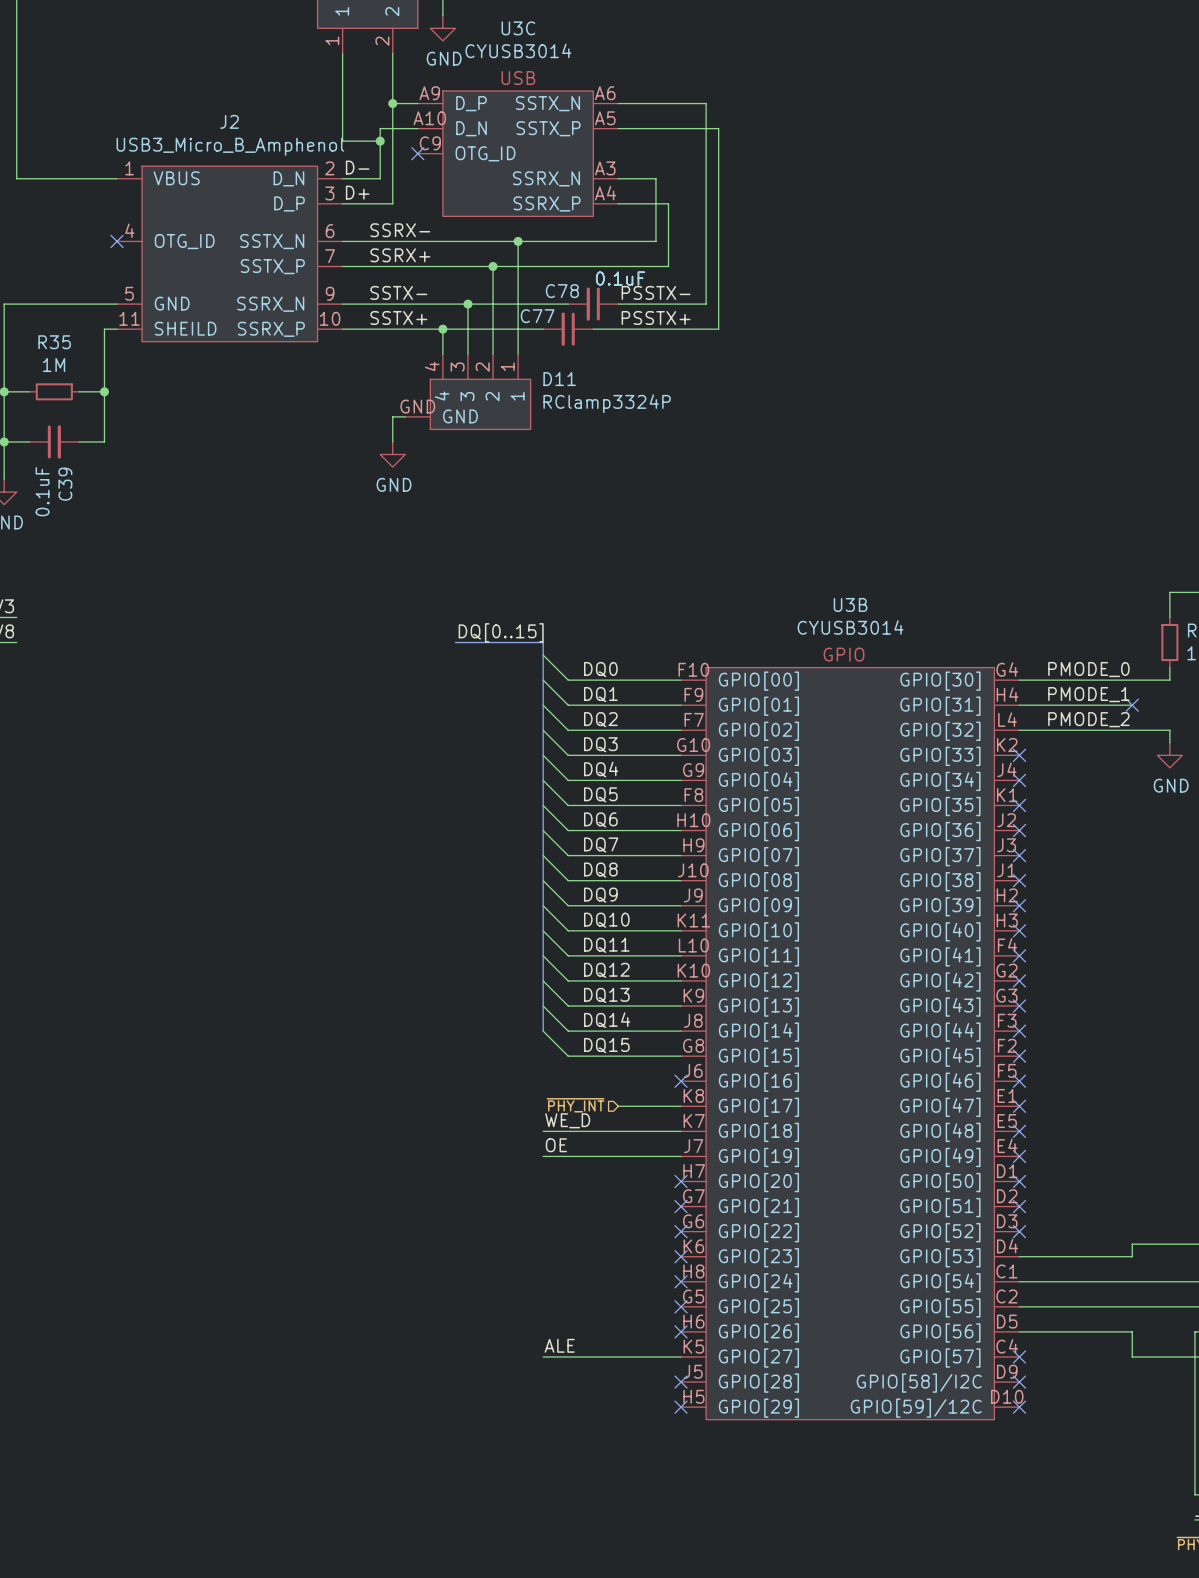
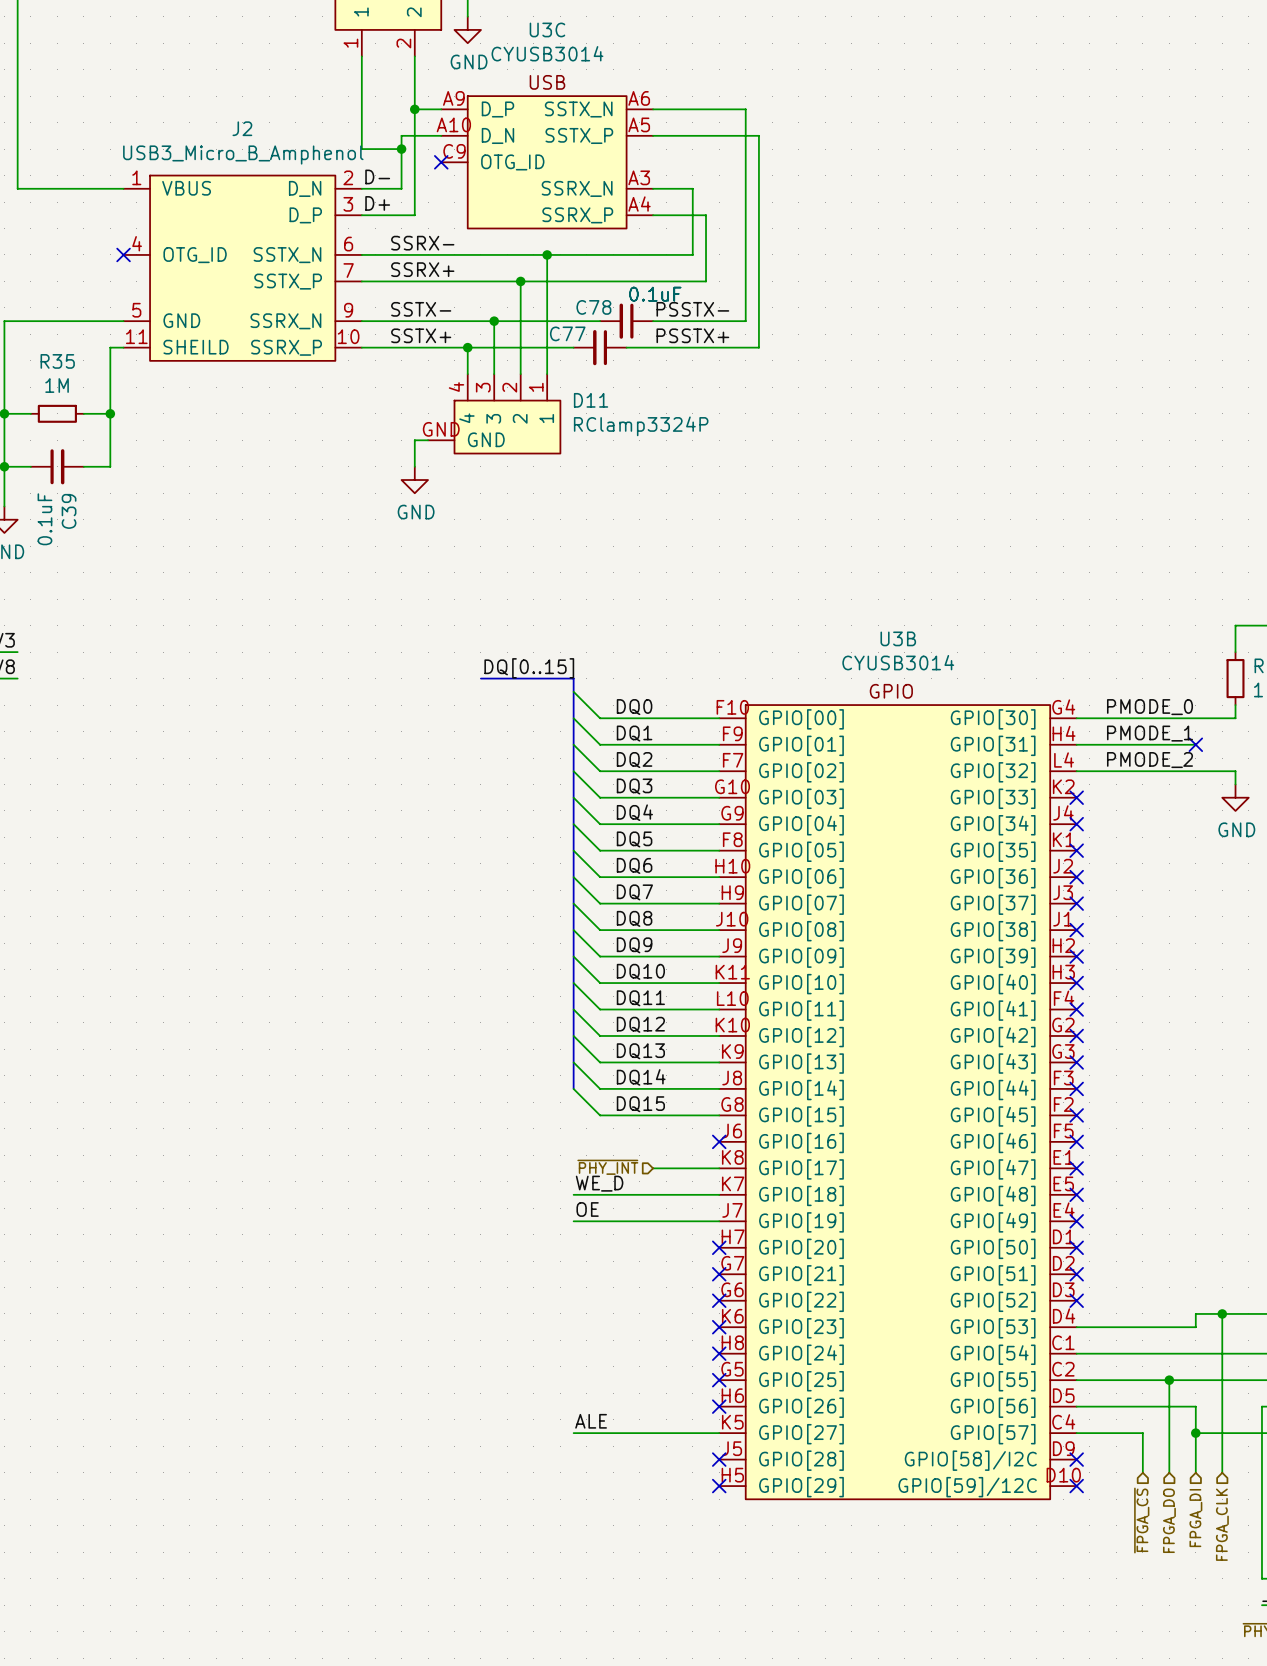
wire: none -> (1222, 1313) (1222, 1472)
junction: none -> (1222, 1313)
wire: none -> (1169, 1380) (1169, 1472)
junction: none -> (1169, 1380)
wire: none -> (1076, 1433) (1142, 1433) (1142, 1472)
no-connect mark: (1019, 1356) -> none
wire: none -> (1195, 1433) (1195, 1472)
junction: none -> (1195, 1433)
hierarchical label: none -> FPGA_DI (1195, 1518)
hierarchical label: none -> ~{FPGA_CS} (1141, 1520)
hierarchical label: none -> FPGA_DO (1169, 1520)
hierarchical label: none -> FPGA_CLK (1222, 1524)

